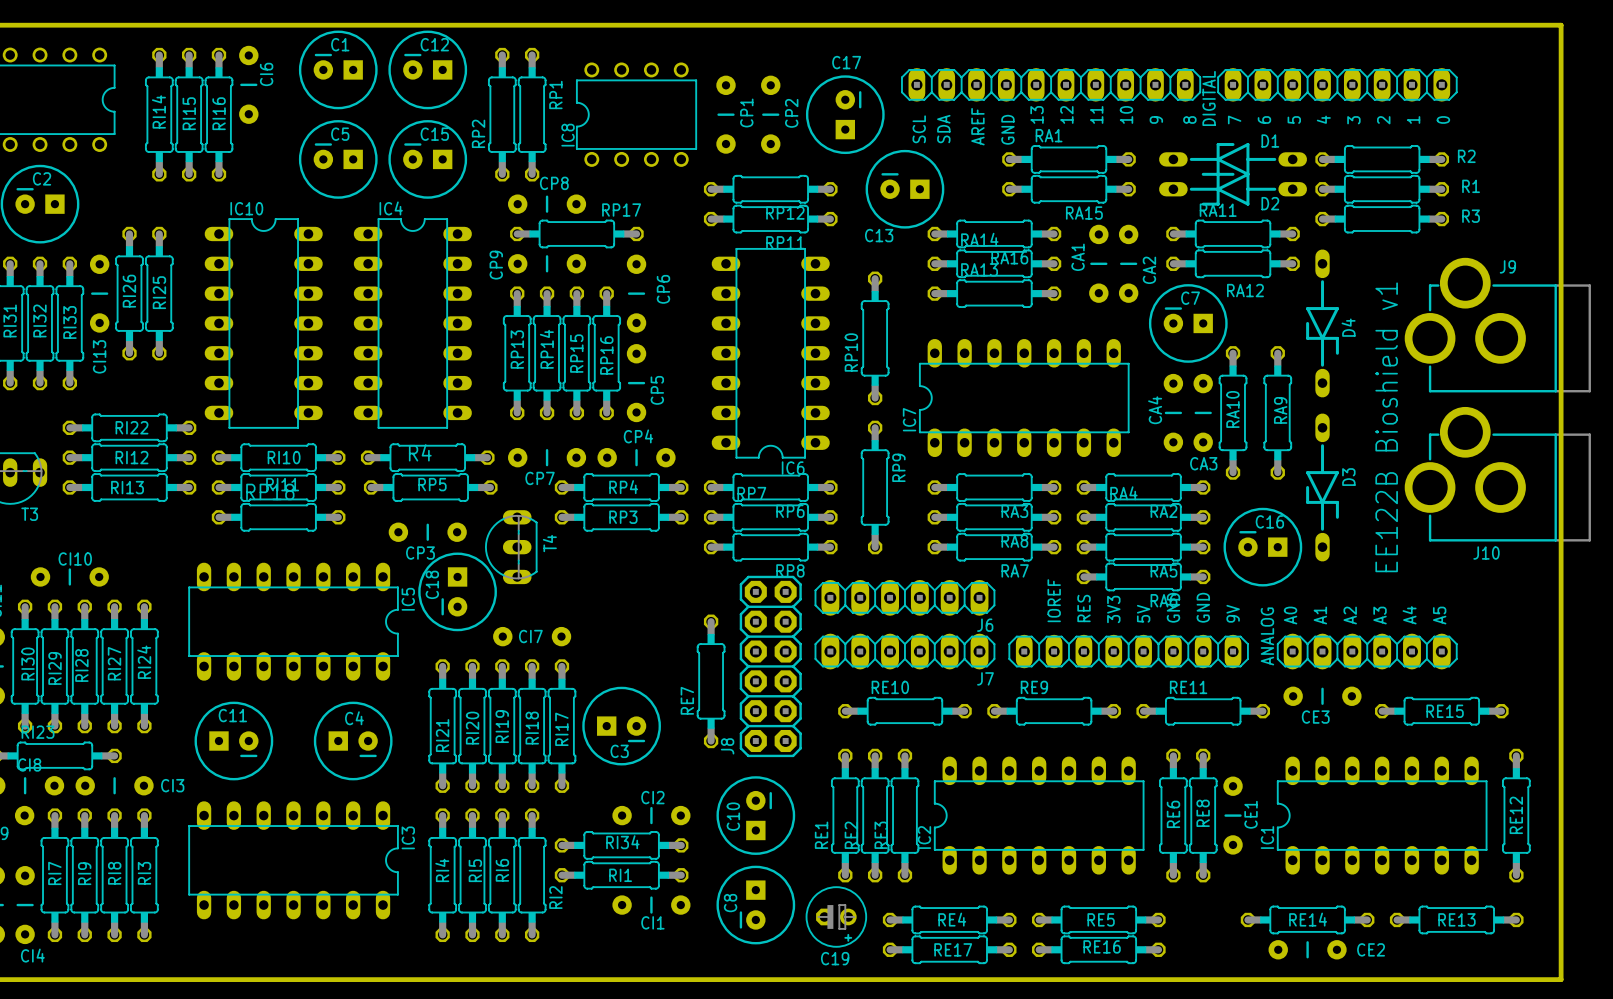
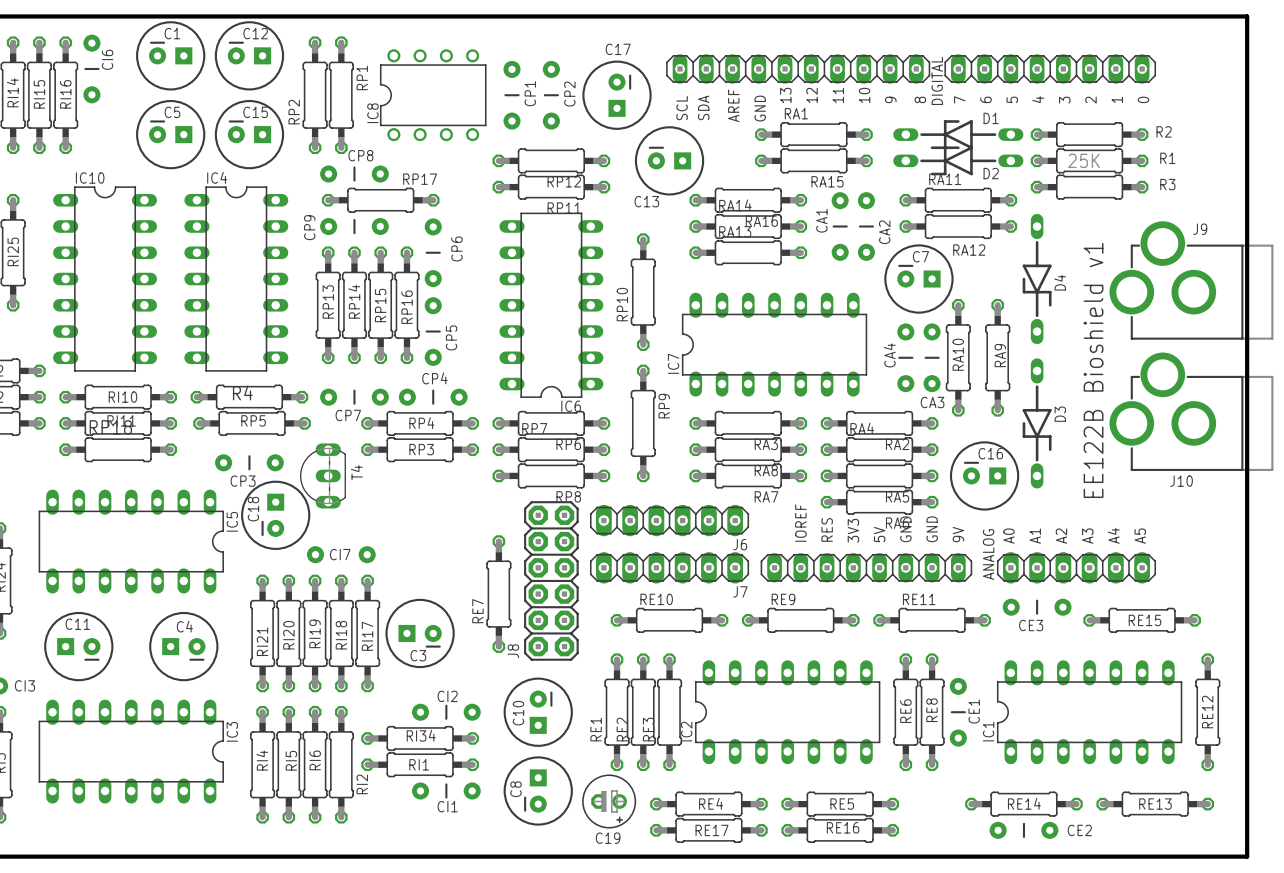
R1 value: none -> 25K (1083, 160)

